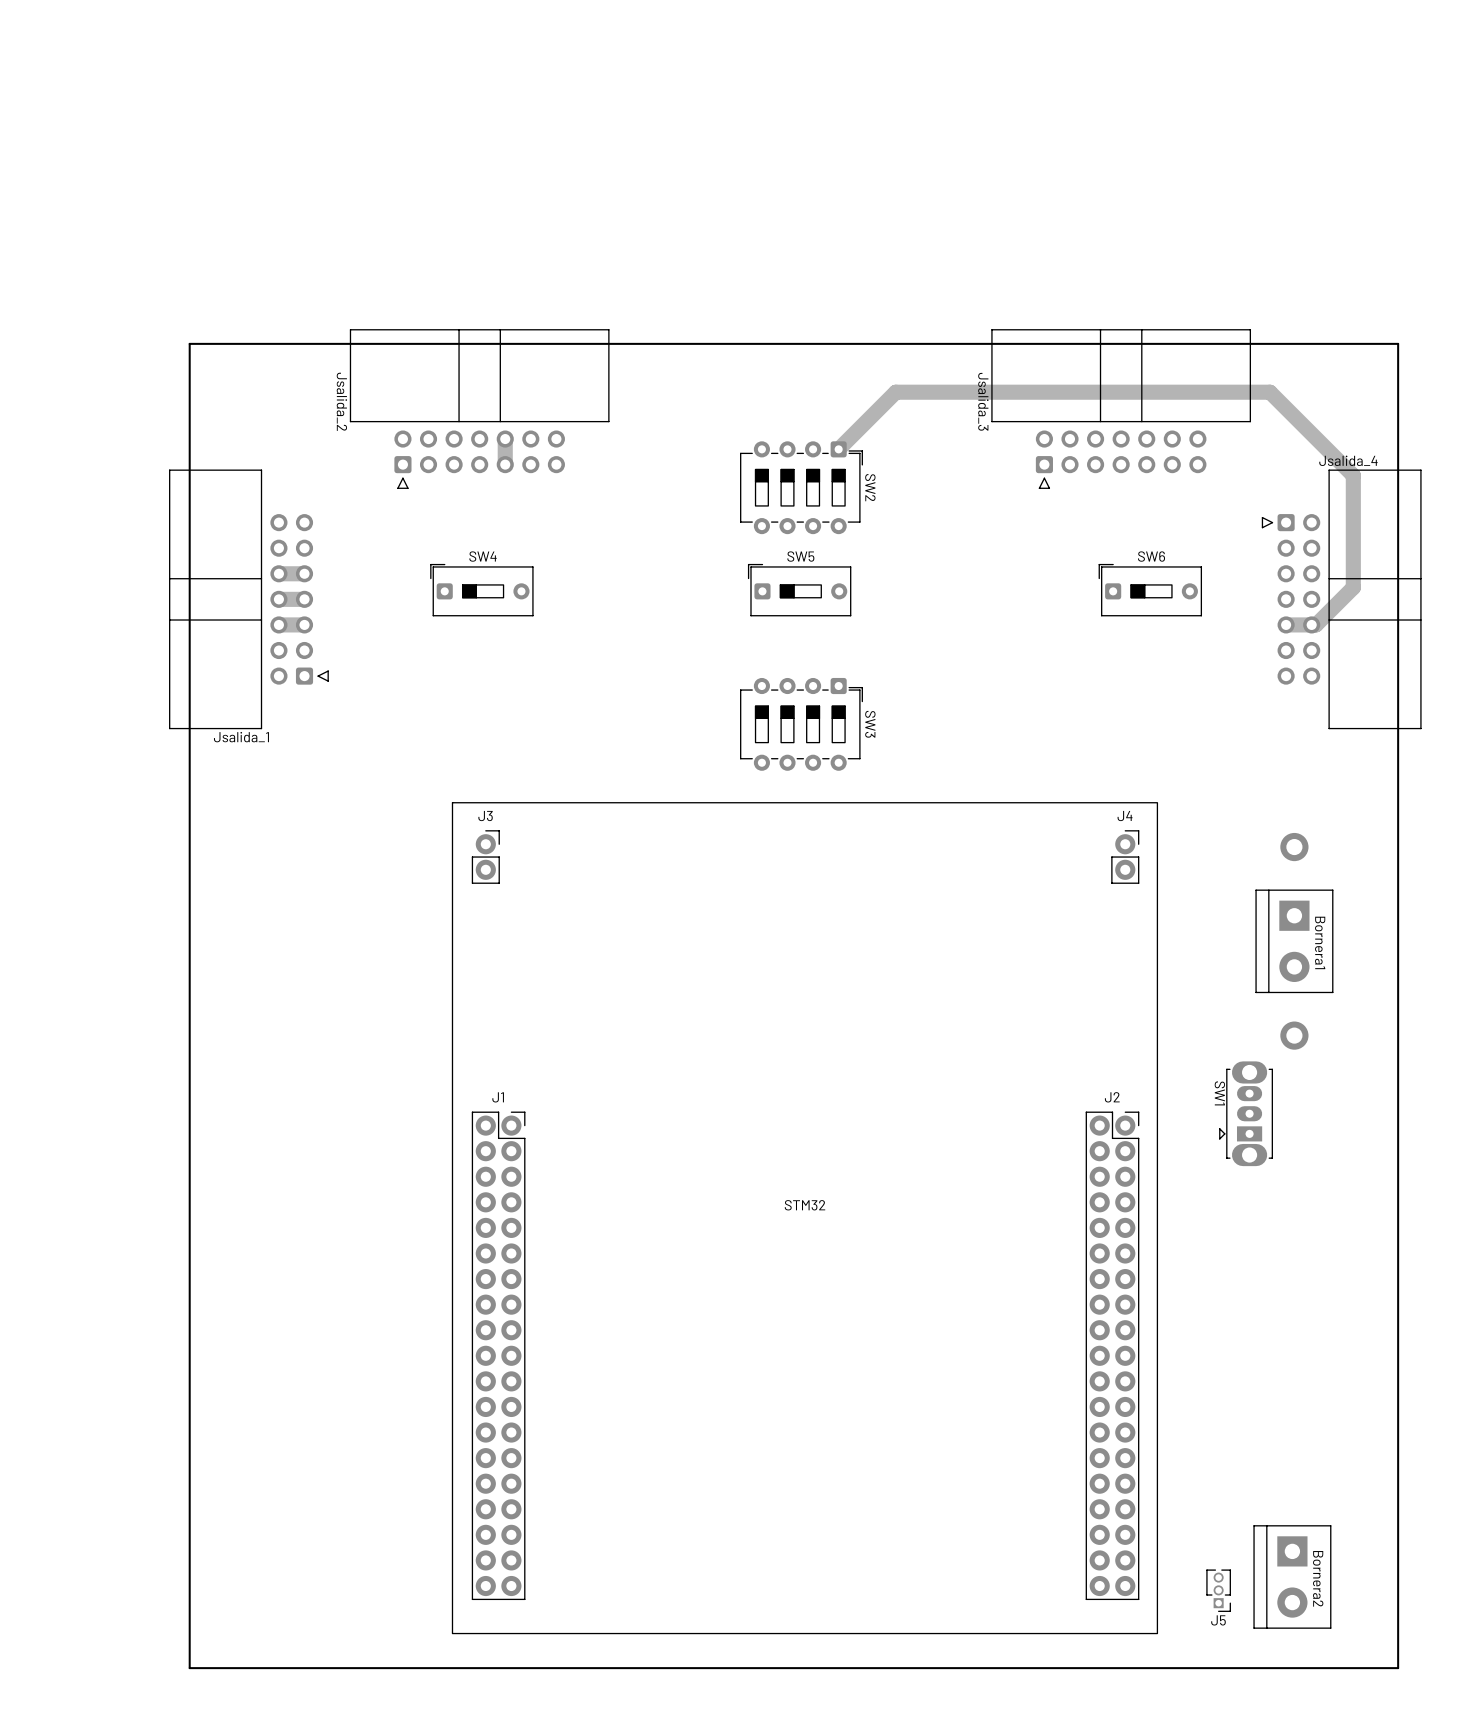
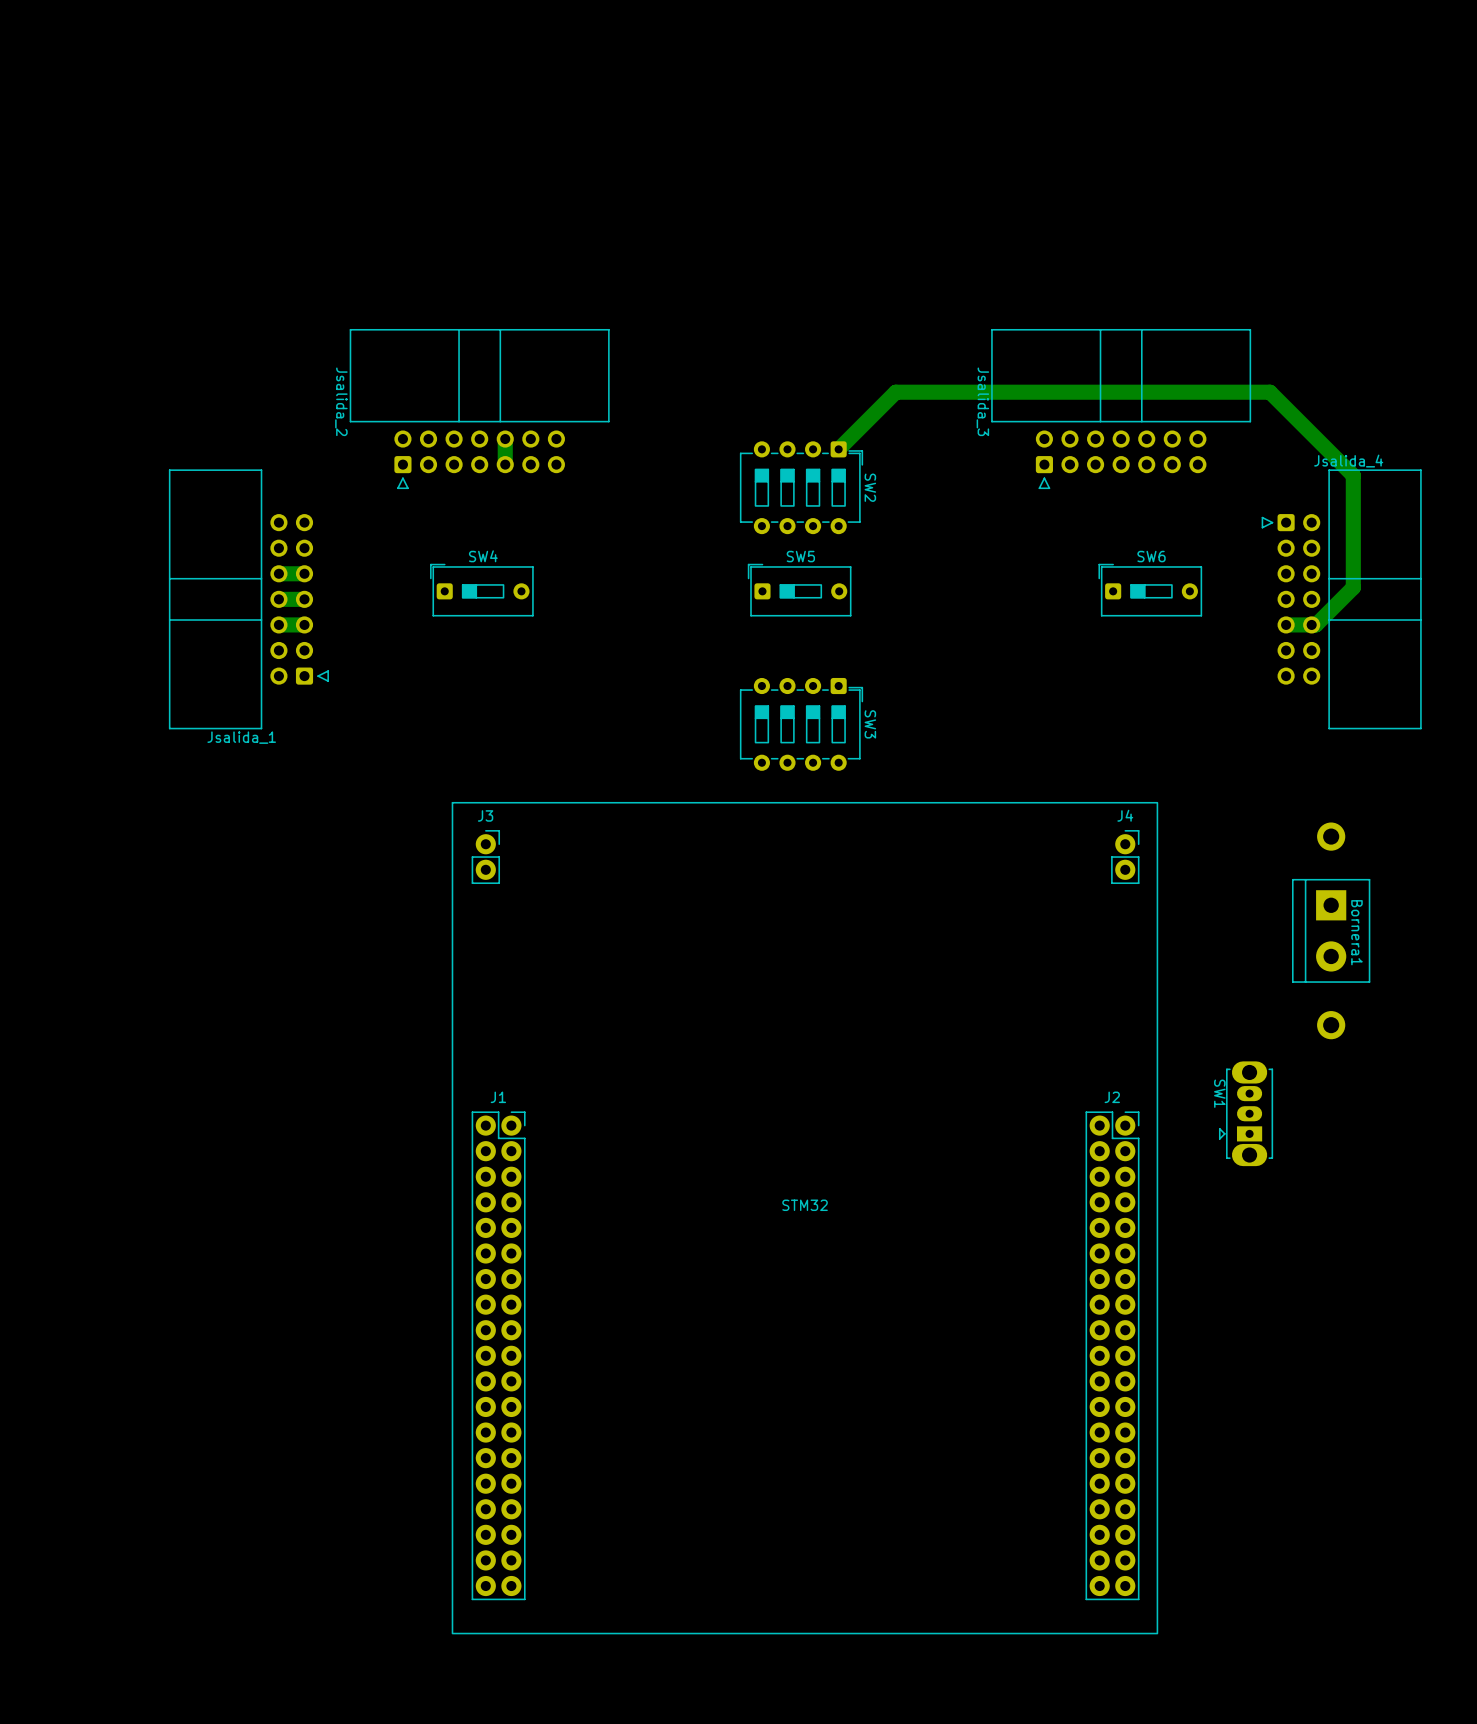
board edge: (1398, 343) (189, 343) (189, 1668) (1398, 1668) (1398, 343) -> none
part position: (1294, 847) -> (1331, 836)
Bornera1 position: (1294, 941) -> (1331, 930)
part position: (1294, 1035) -> (1331, 1025)
Bornera2: (1292, 1576) -> none
J5: (1218, 1590) -> none

